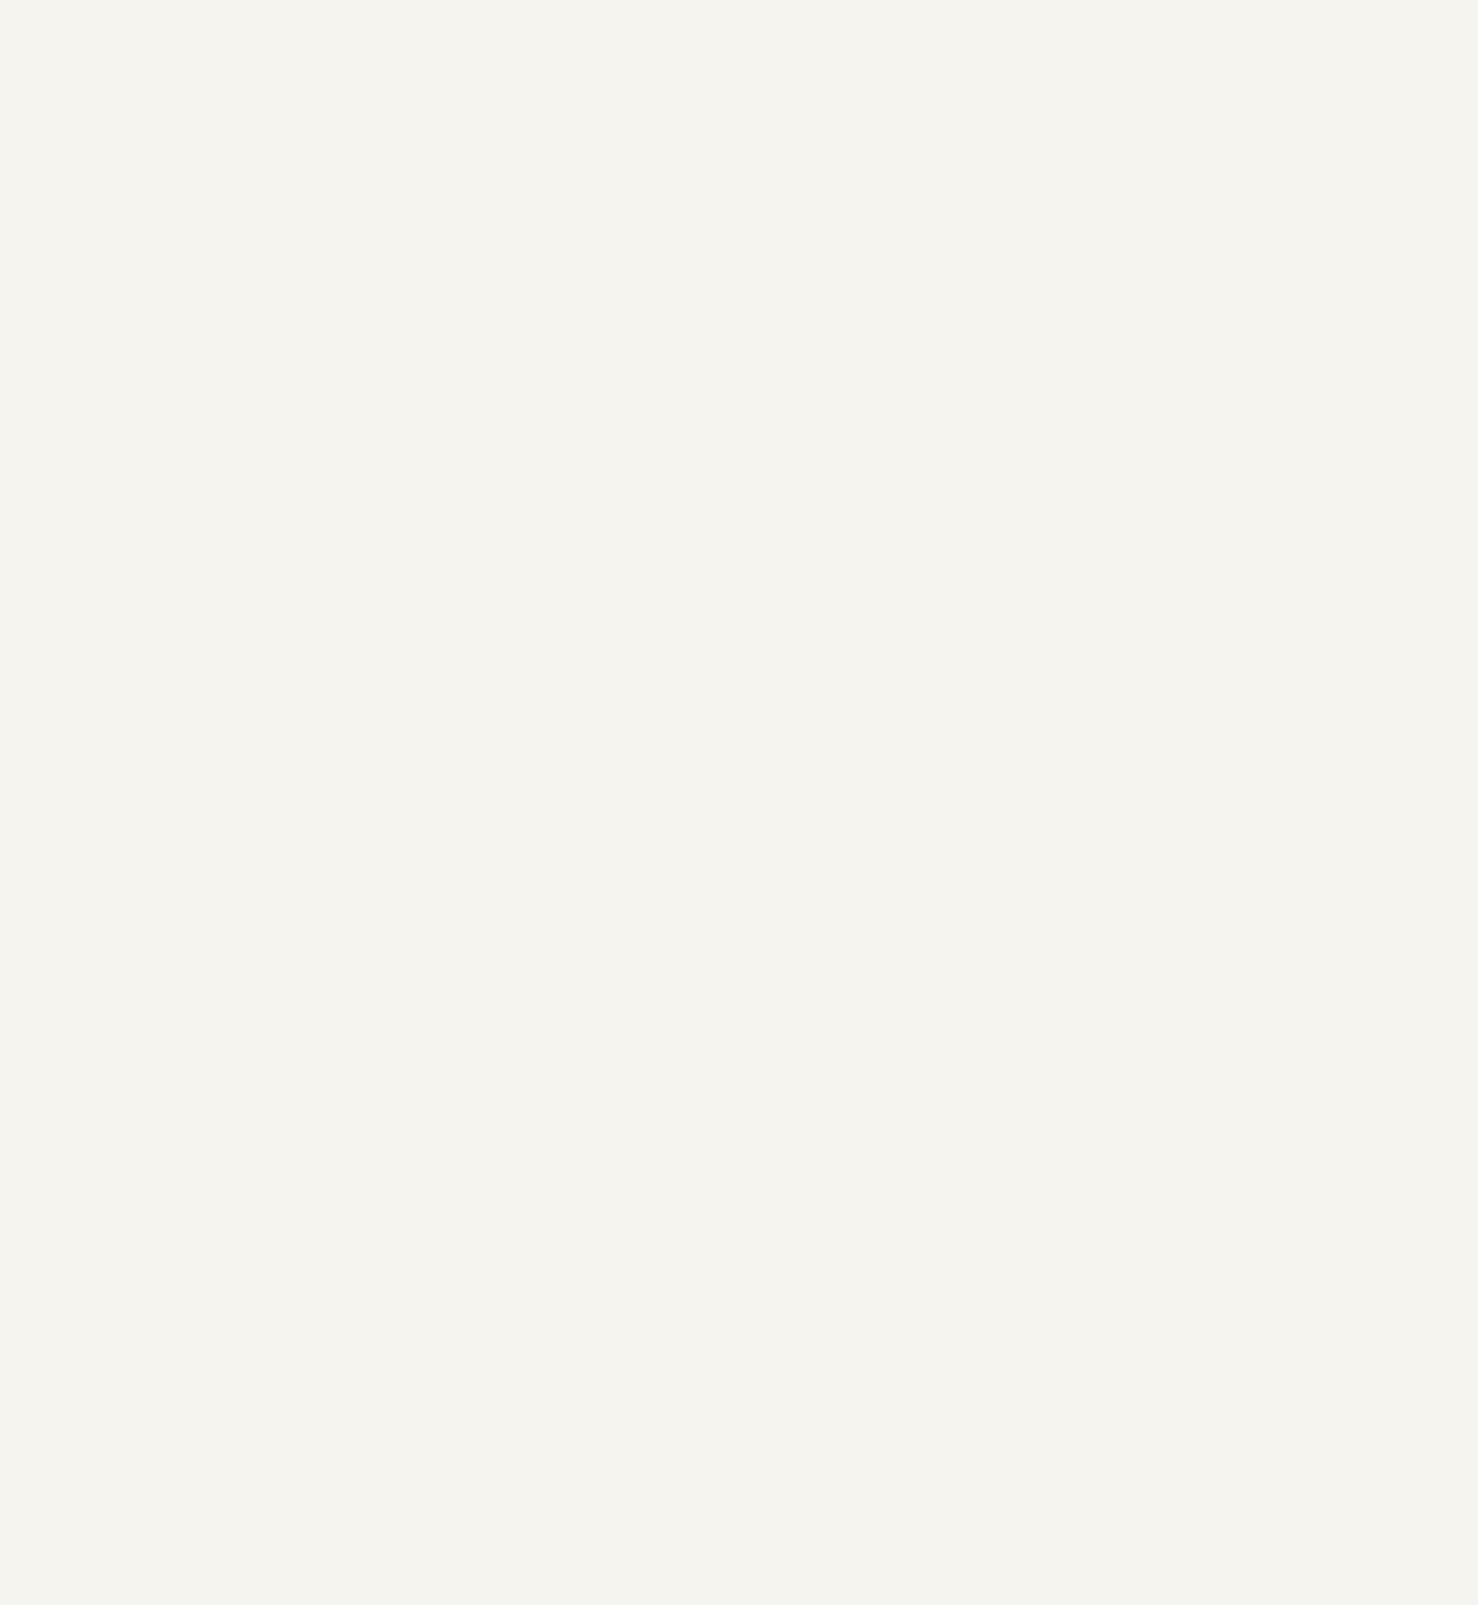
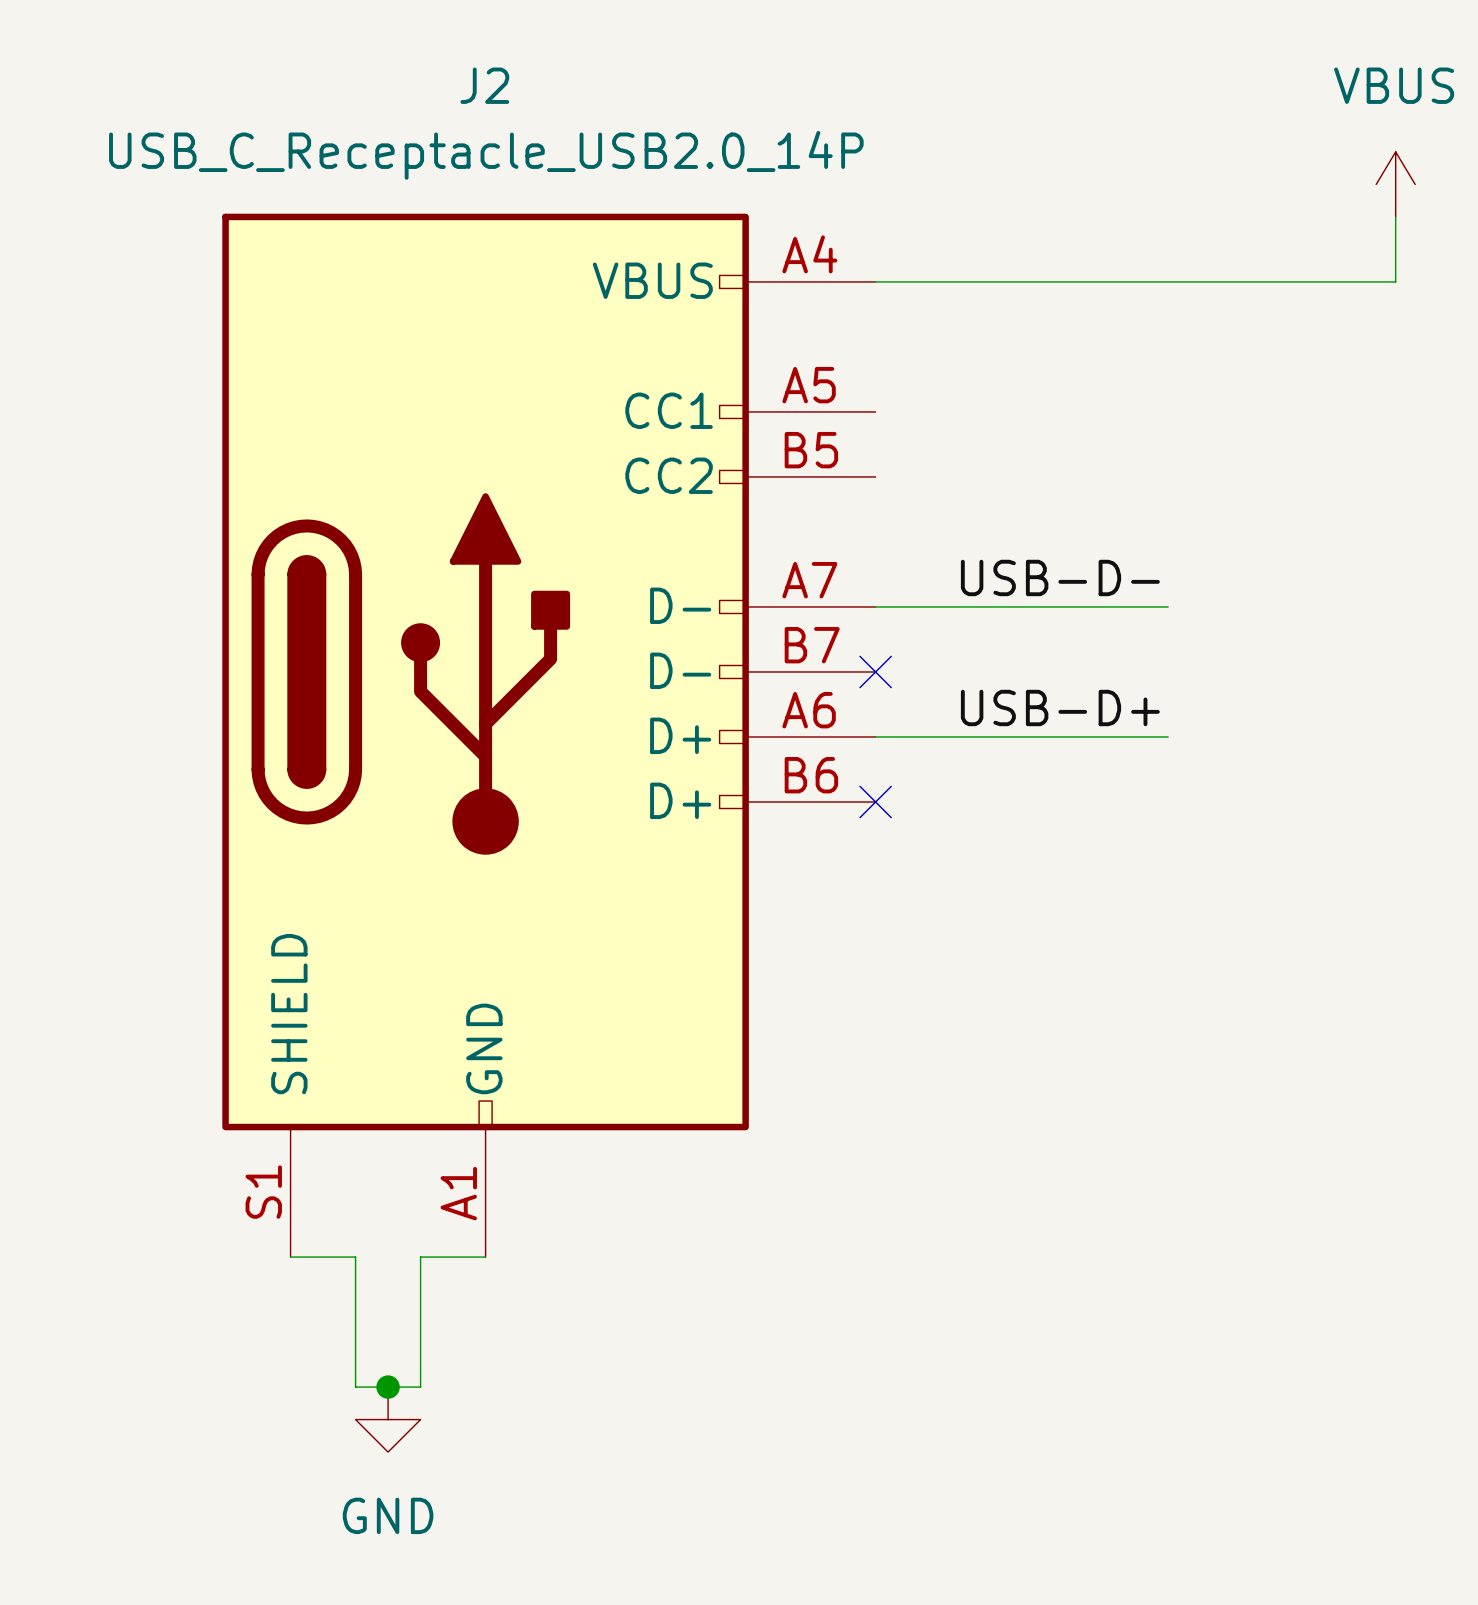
power symbol: none -> VBUS (1395, 184)
wire: none -> (1395, 216) (1395, 281) (875, 281)
label: none -> USB-D- (1060, 577)
wire: none -> (875, 606) (1168, 606)
no-connect mark: none -> (875, 671)
label: none -> USB-D+ (1060, 707)
J2: none -> USB_C_Receptacle_USB2.0_14P (548, 735)
wire: none -> (875, 737) (1168, 737)
no-connect mark: none -> (875, 802)
wire: none -> (290, 1257) (355, 1257) (355, 1387) (420, 1387) (420, 1257) (485, 1257)
junction: none -> (388, 1387)
power symbol: none -> GND (388, 1419)

